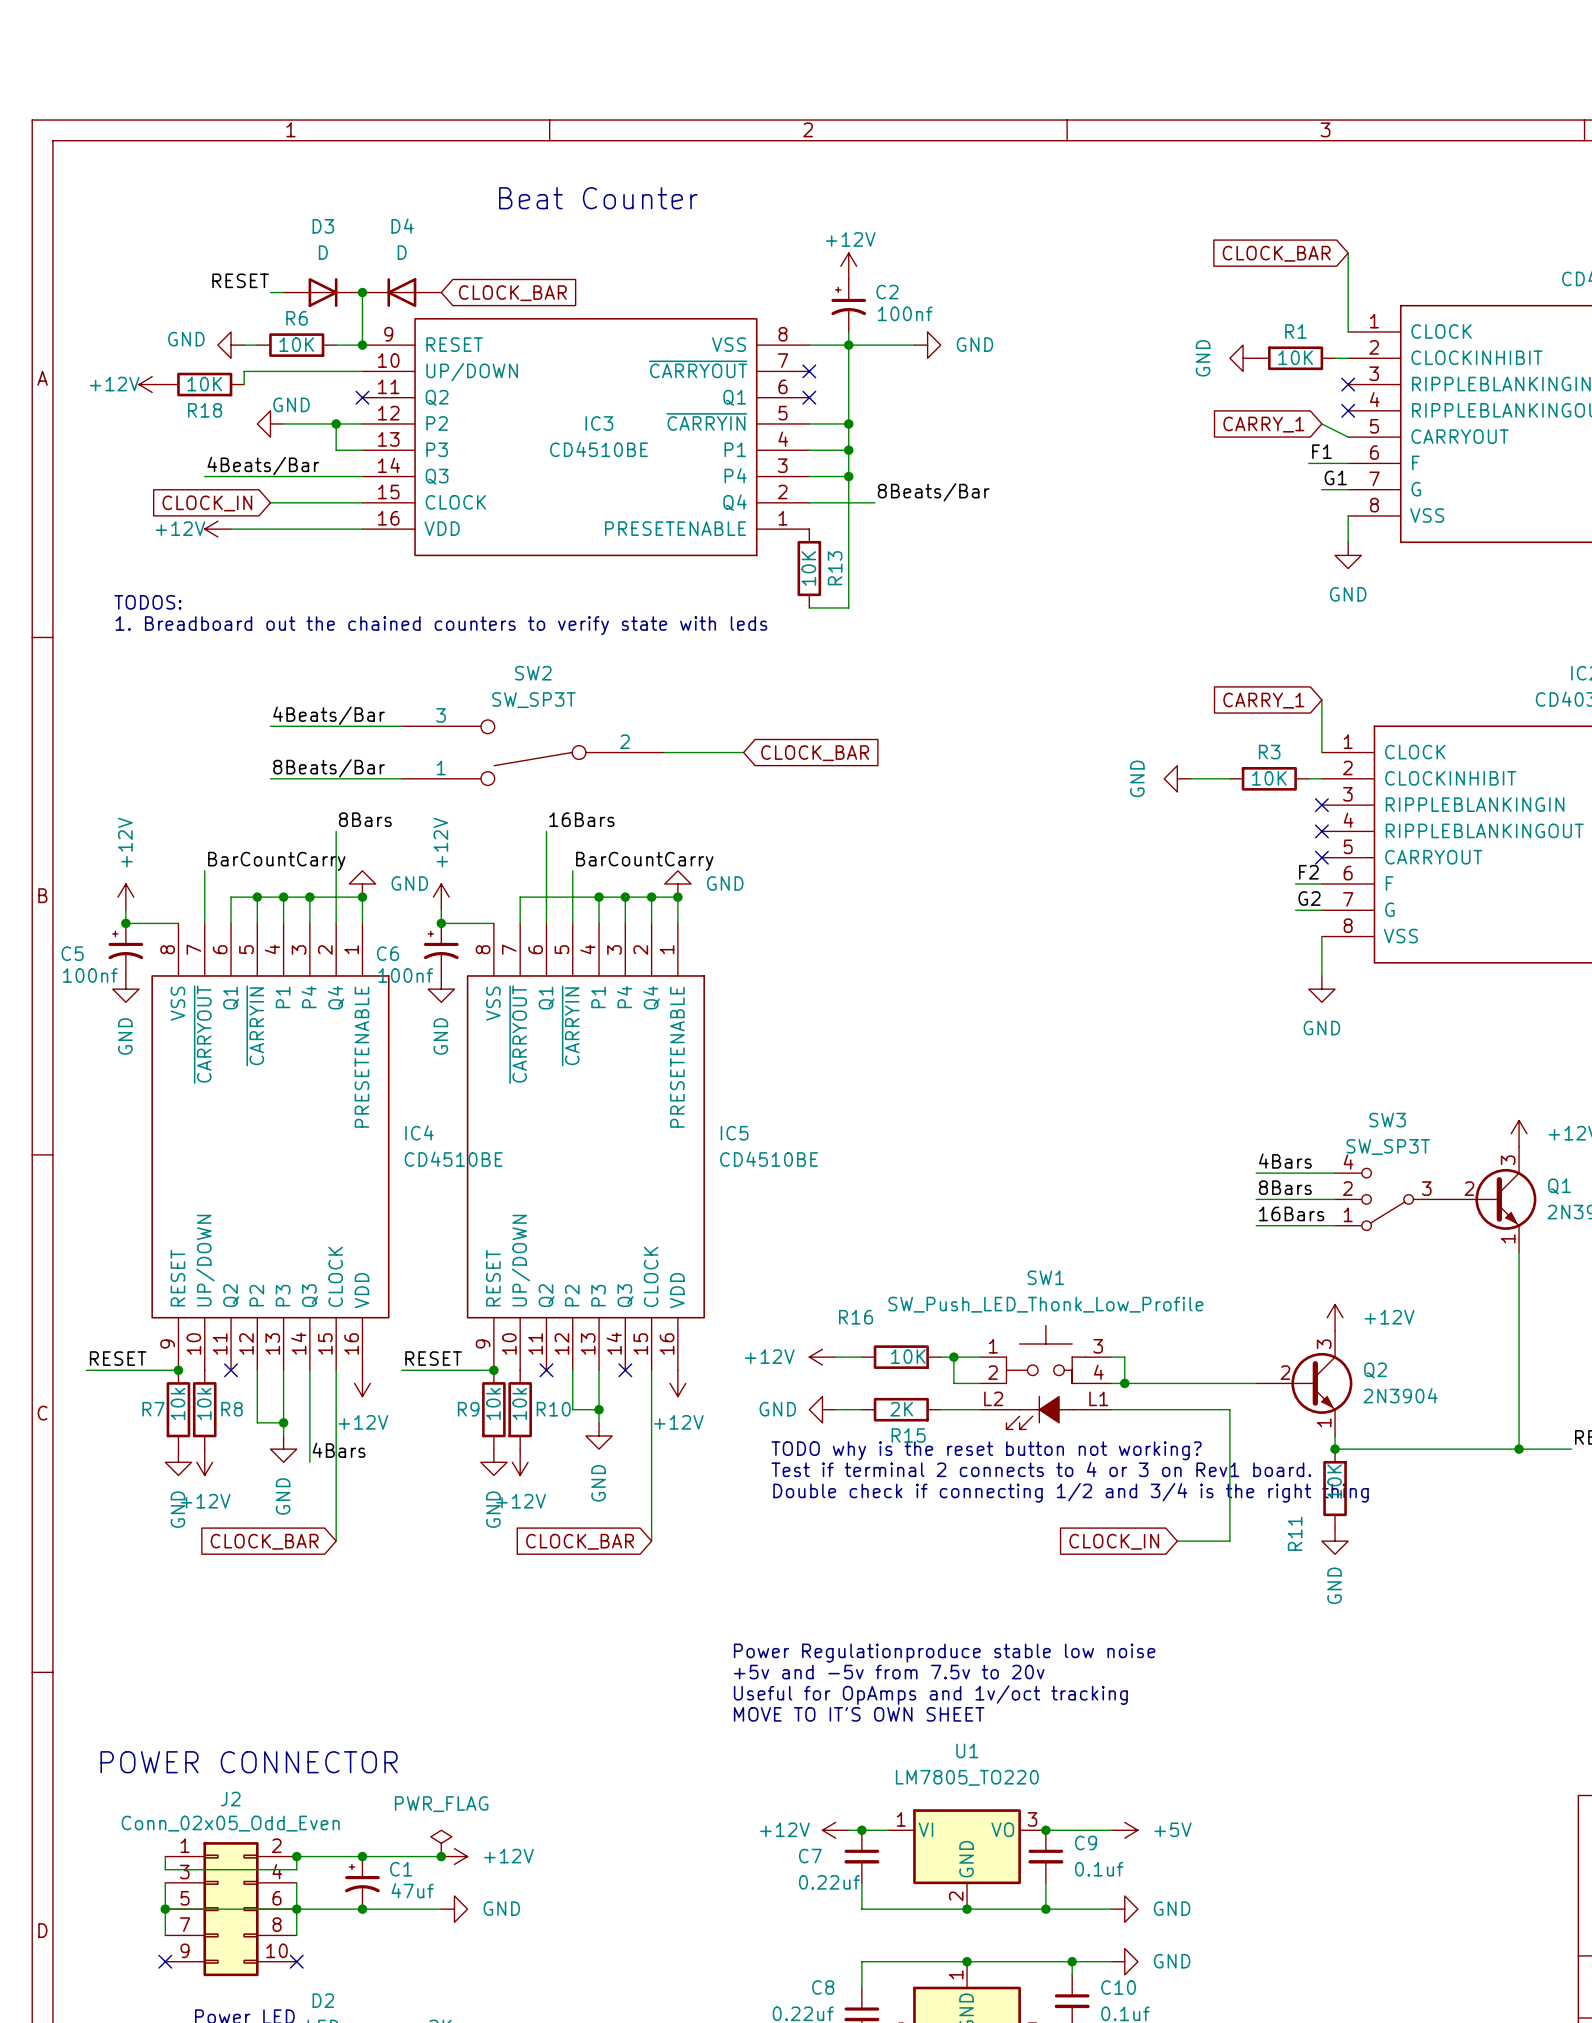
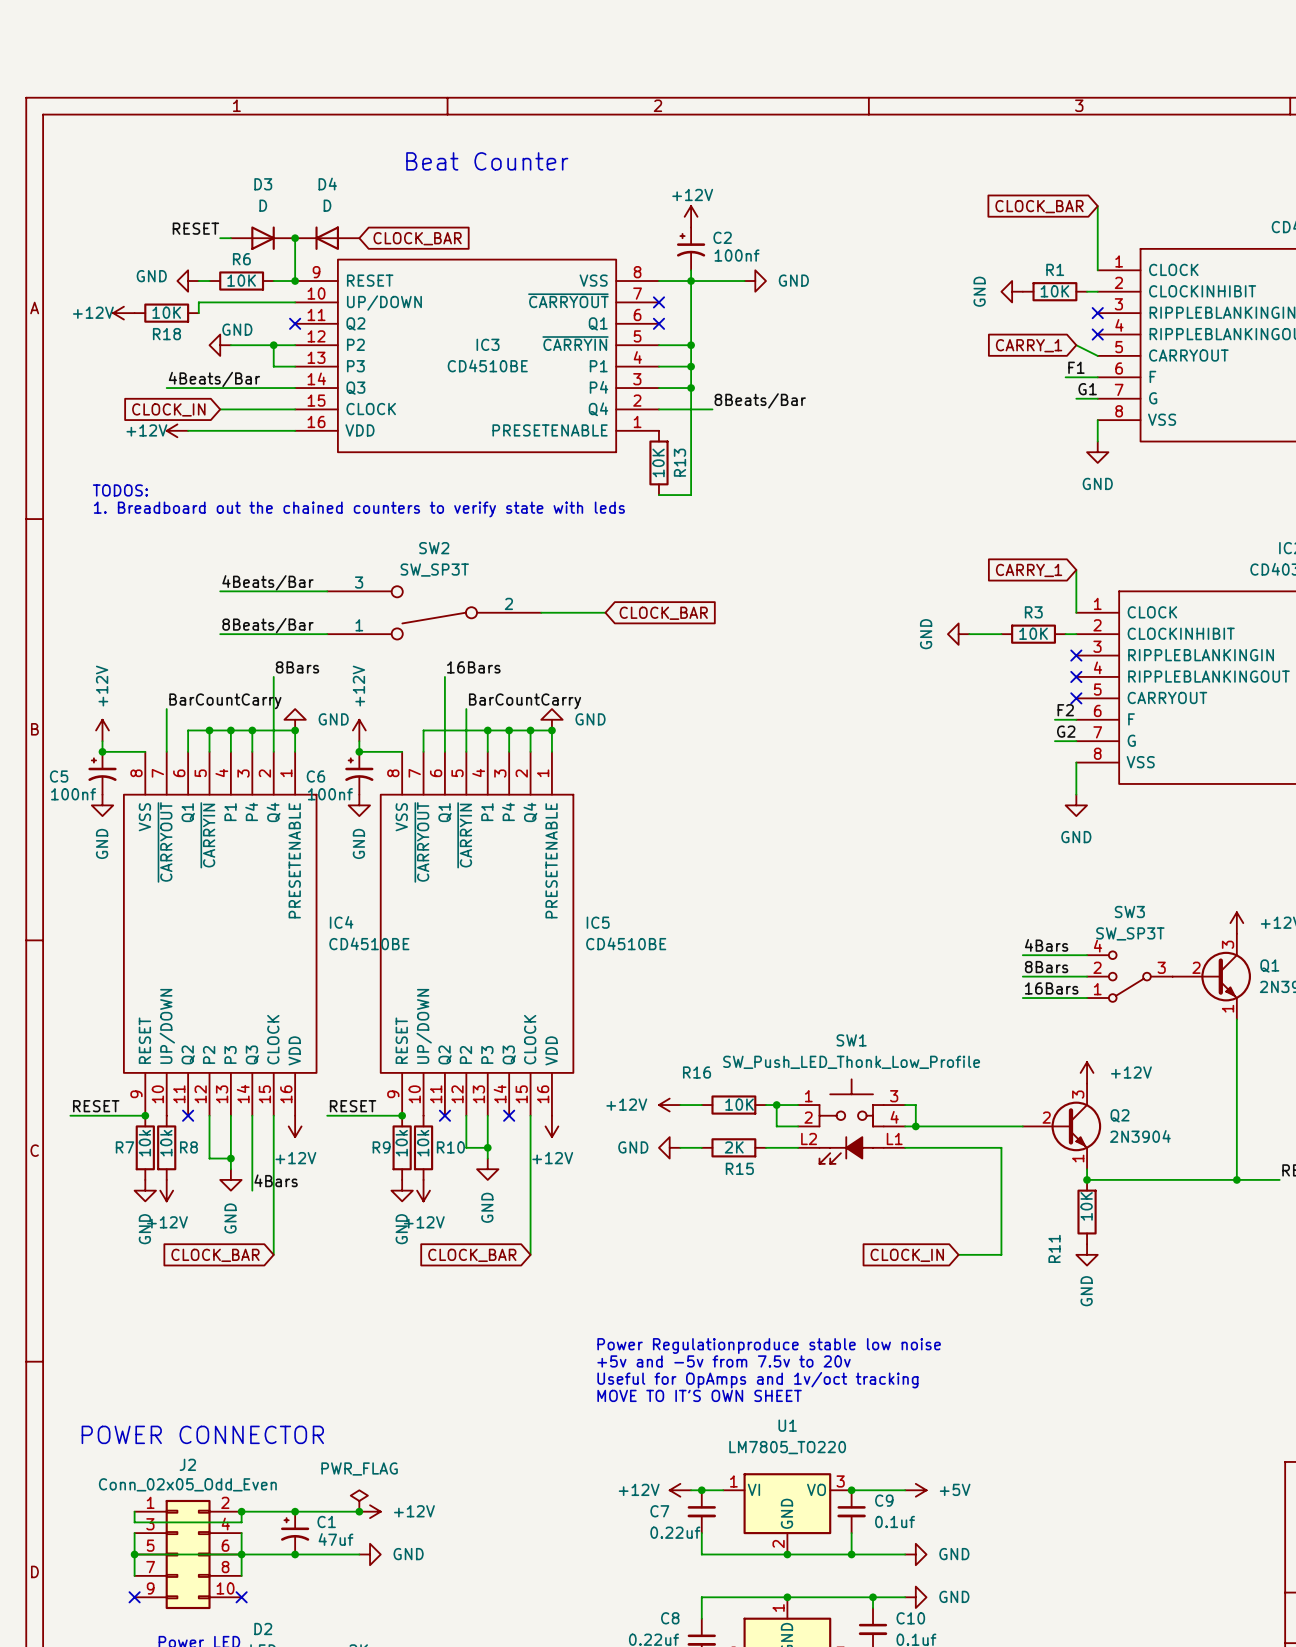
text: TODO why is the reset button not working? (986, 1450) -> none
text: Test if terminal 2 connects to 4 or 3 on Rev1 board. (1041, 1469) -> none
text: Double check if connecting 1/2 and 3/4 is the right thing (1071, 1492) -> none

